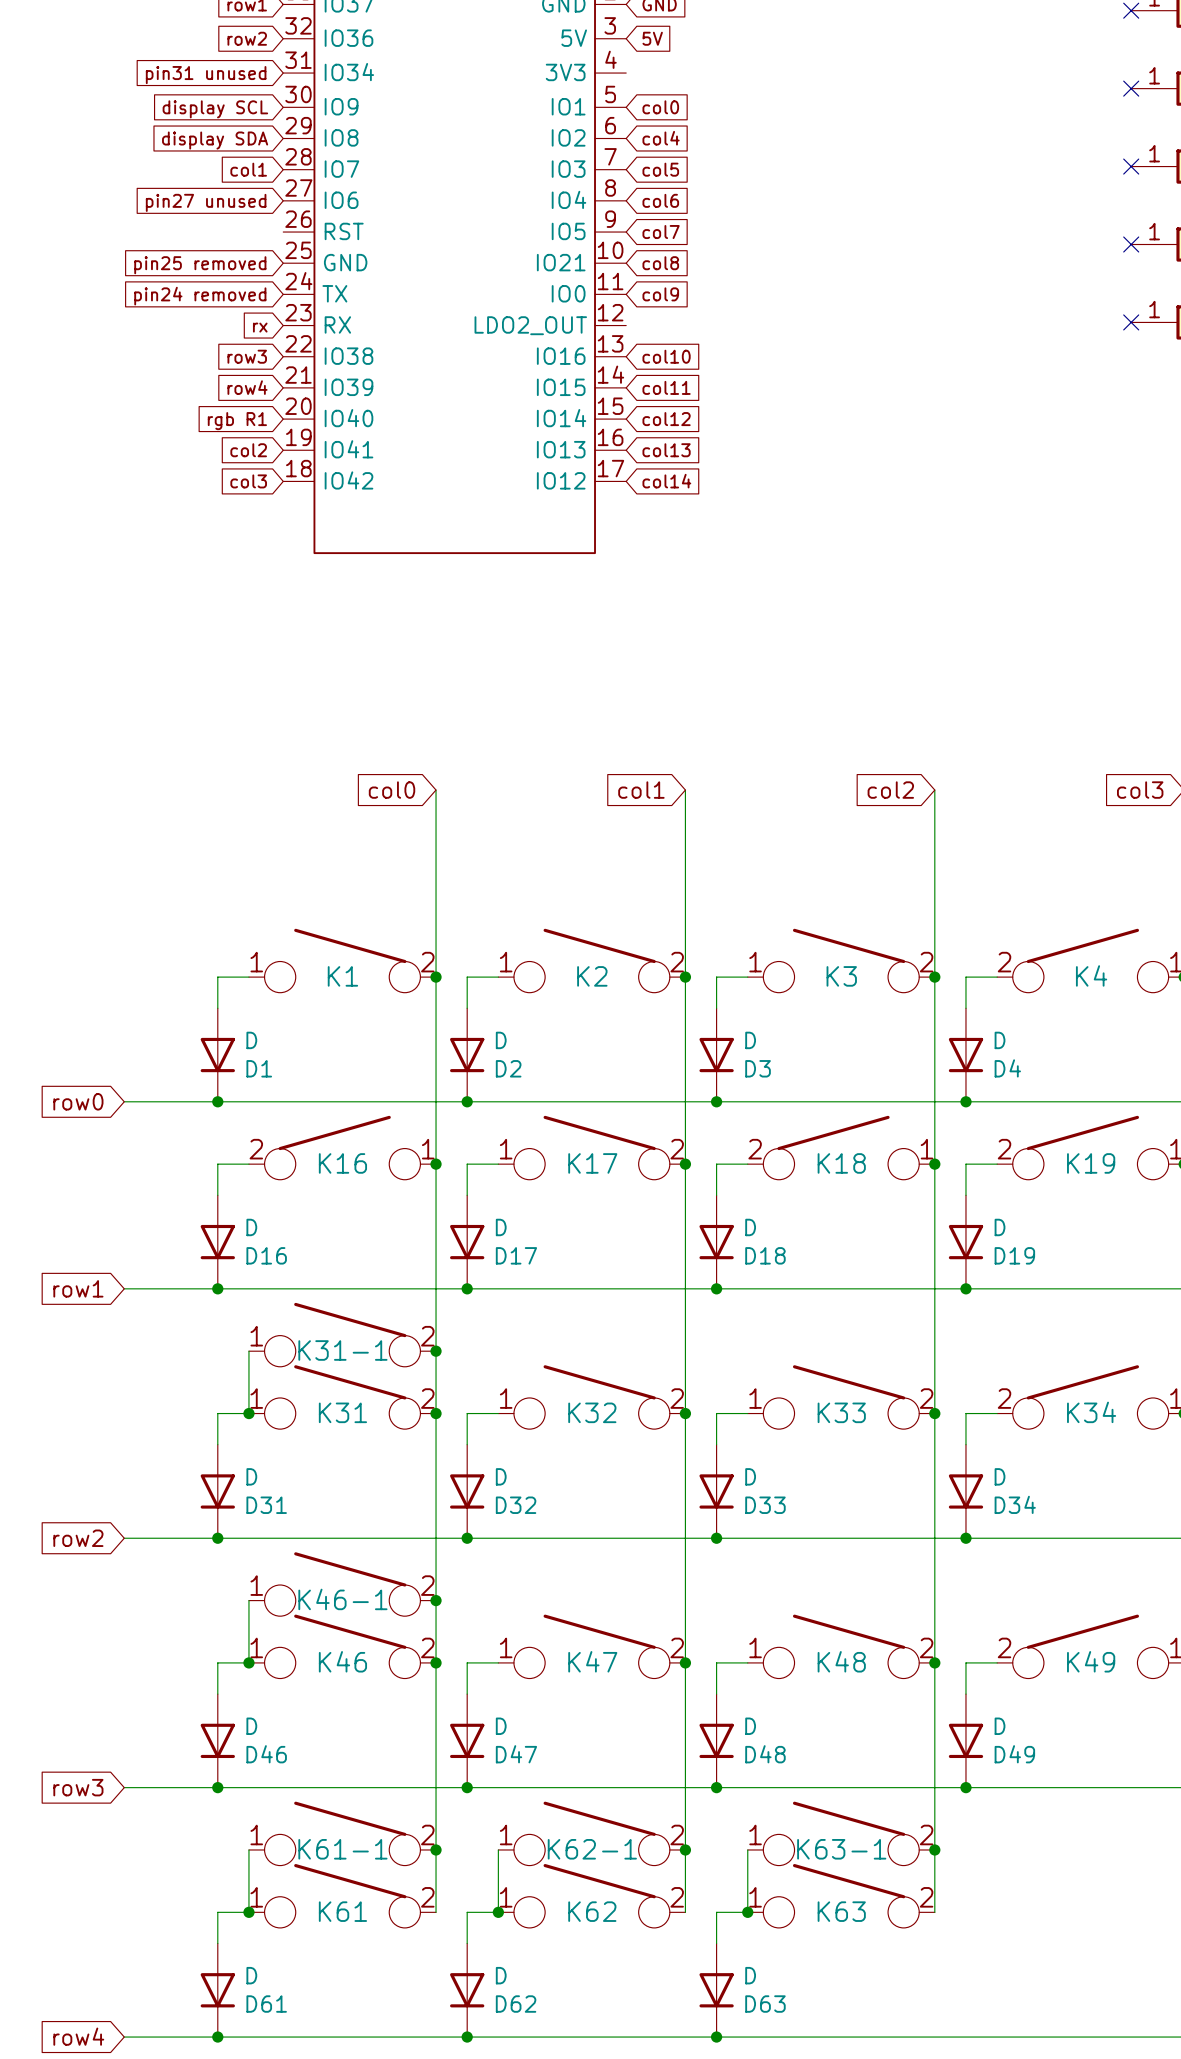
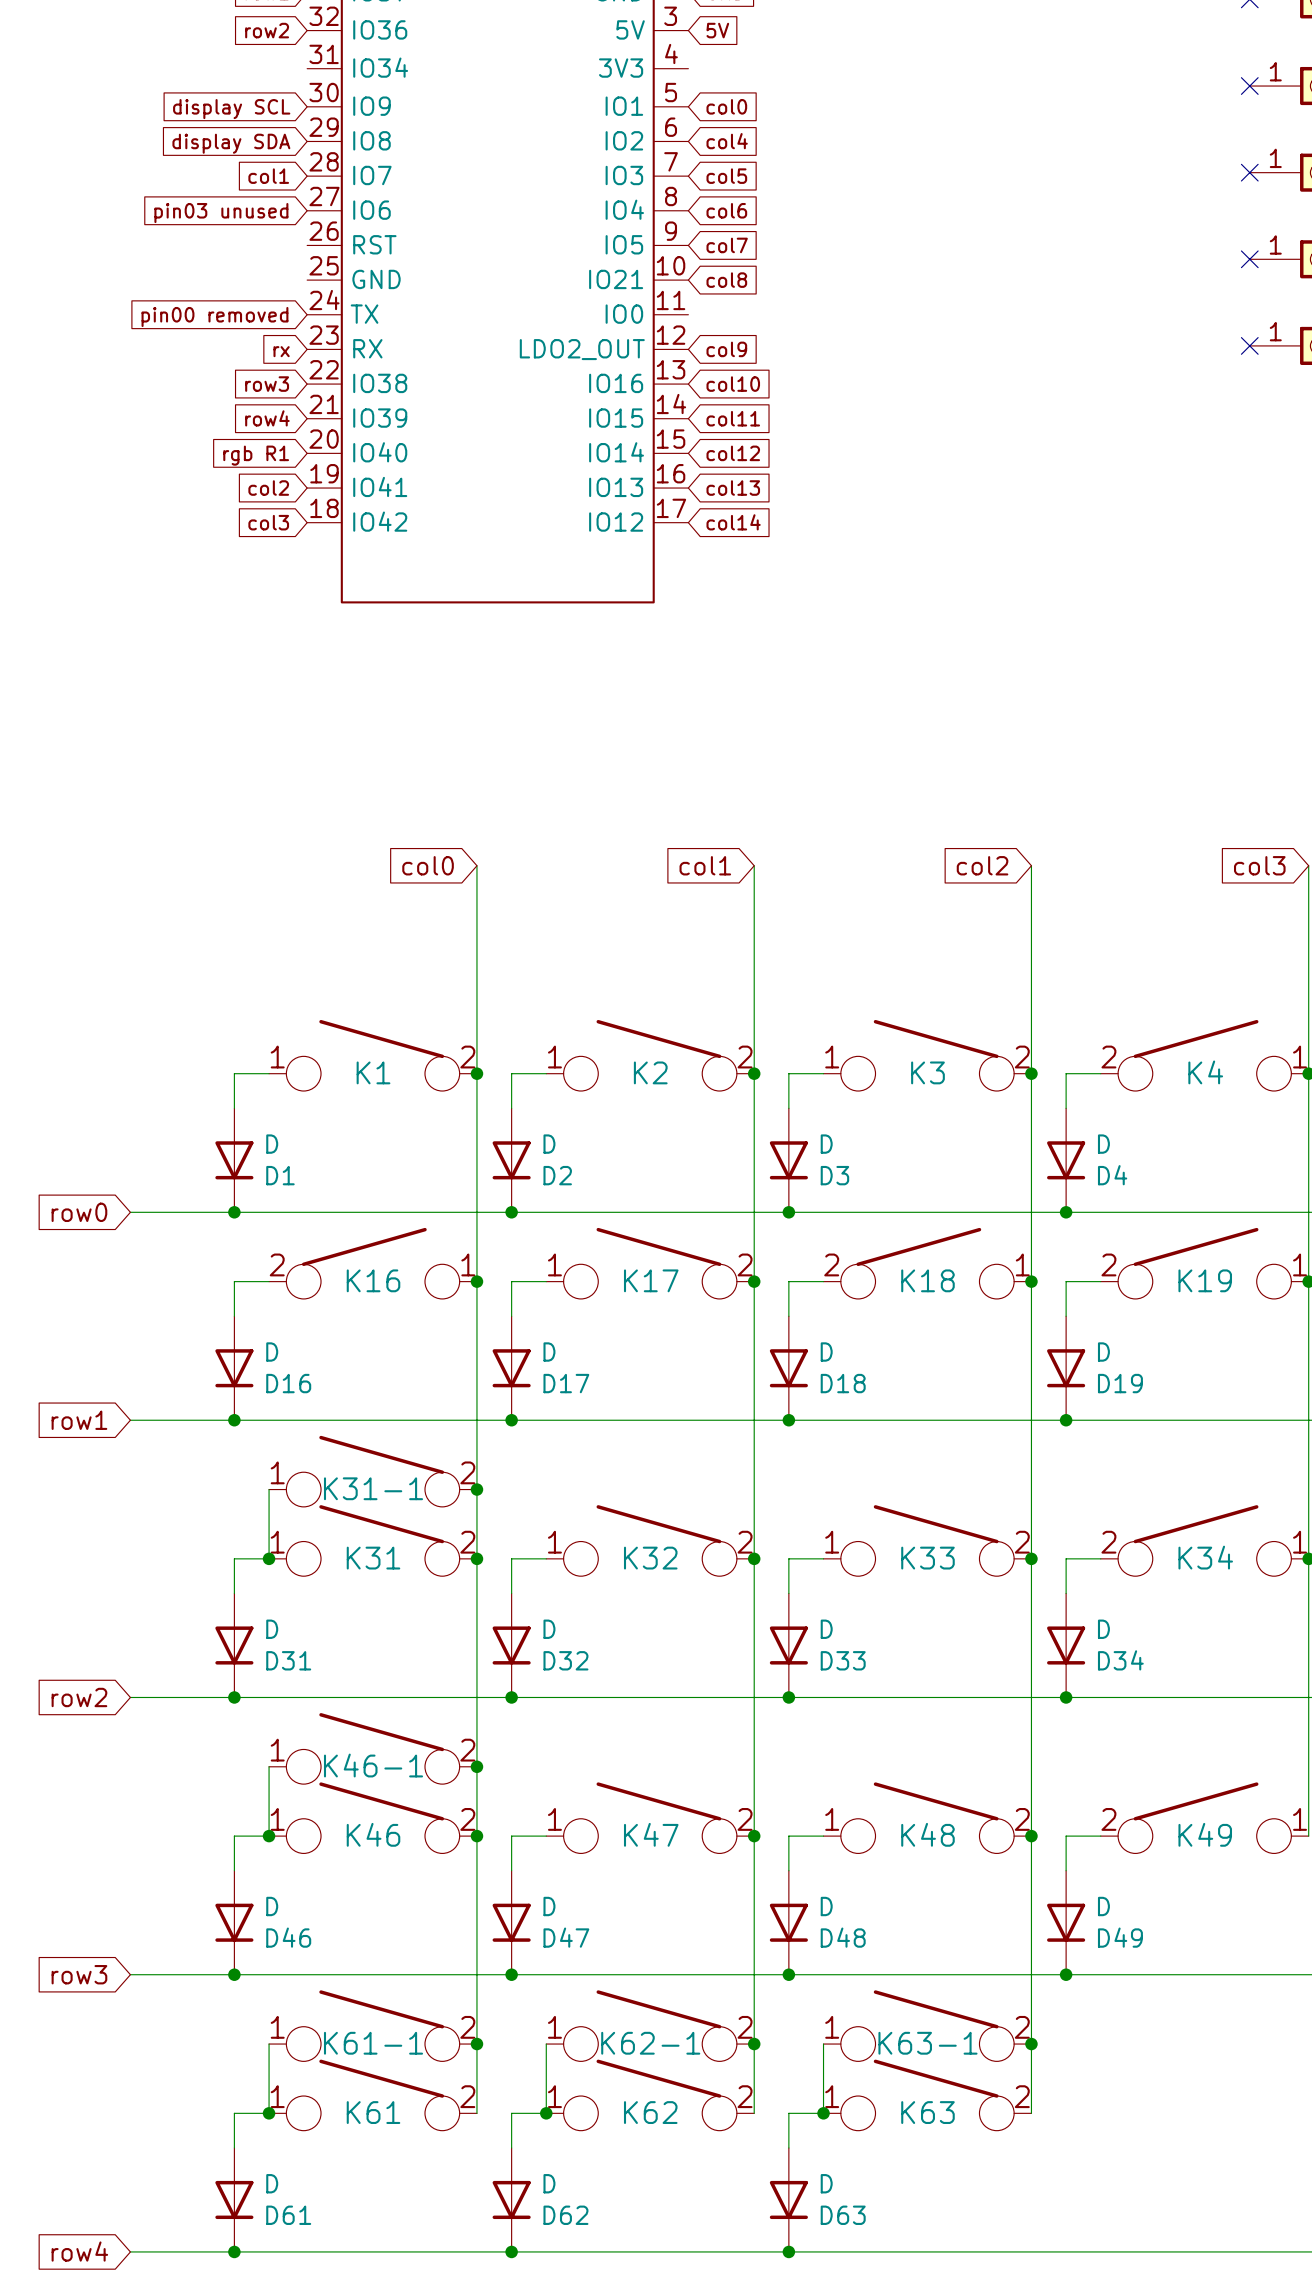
global label: pin31 unused (206, 75) -> none
global label: pin27 unused (206, 202) -> pin03 unused (221, 213)
global label: pin25 removed (200, 265) -> none
global label position: col9 (660, 294) -> col9 (726, 349)
global label: pin24 removed (200, 296) -> pin00 removed (214, 317)

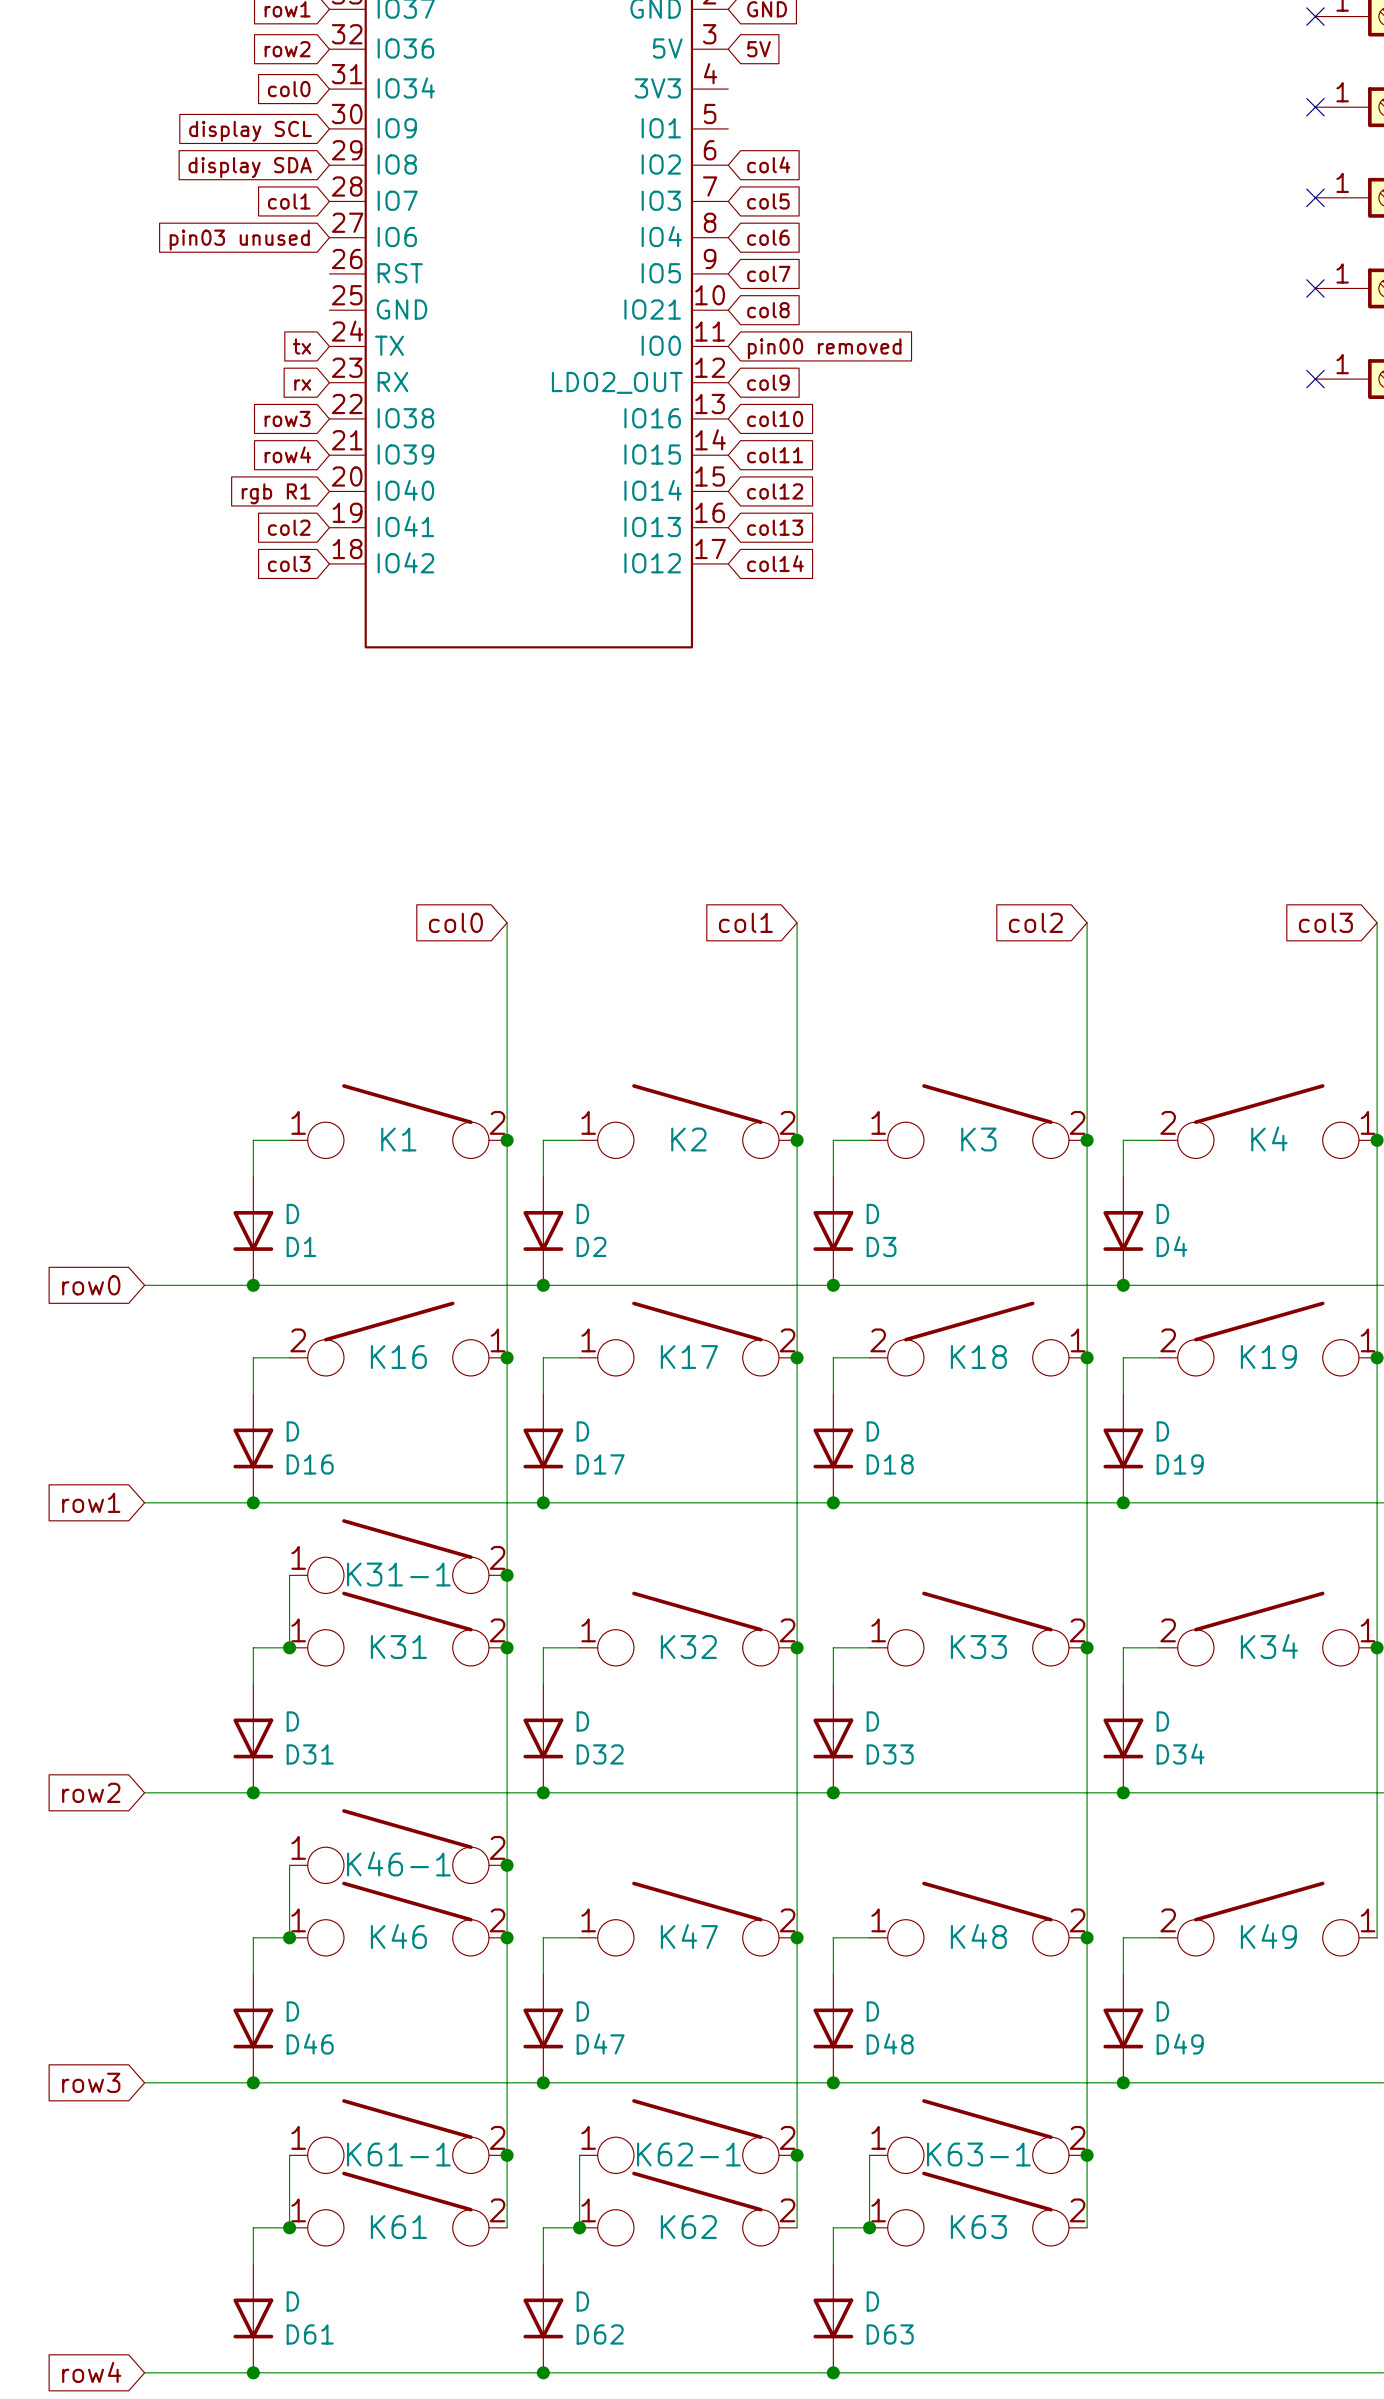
global label: none -> col0 (289, 89)
global label: col0 (726, 106) -> none
global label: pin00 removed (214, 317) -> tx (302, 346)
global label: none -> pin00 removed (824, 348)

